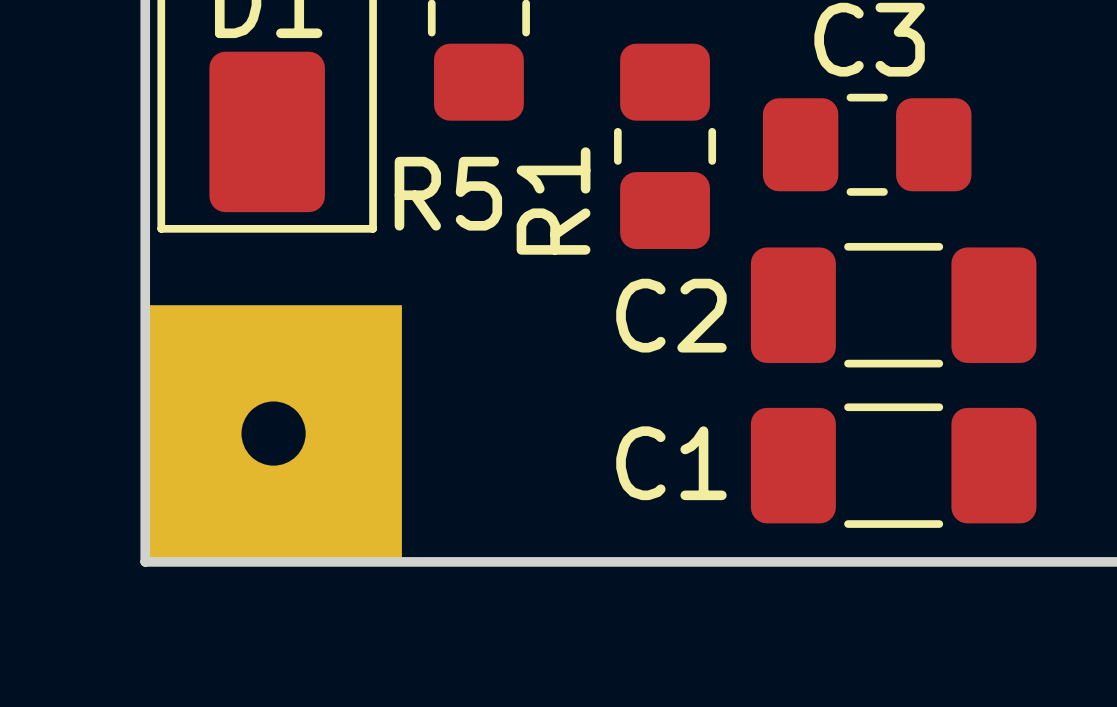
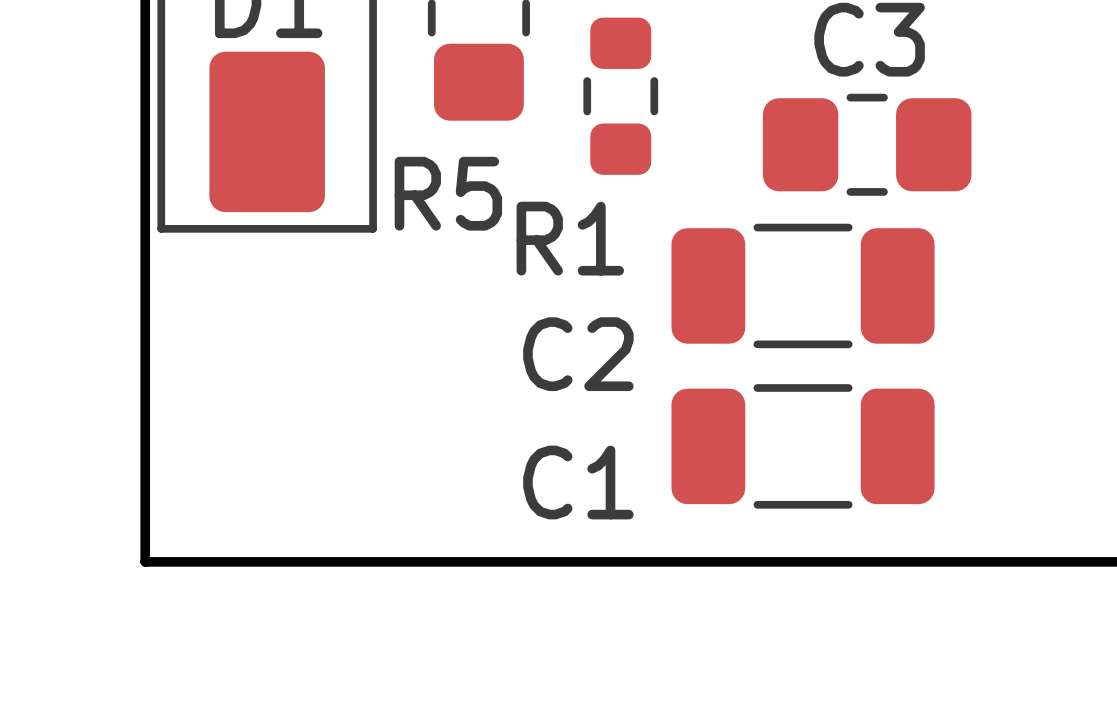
R1 footprint: [614, 43, 717, 250] -> [583, 17, 659, 175]
C2 footprint: [750, 242, 1037, 368] -> [671, 223, 935, 349]
C1 footprint: [750, 403, 1037, 528] -> [671, 384, 935, 509]
part: (273, 433) -> none

